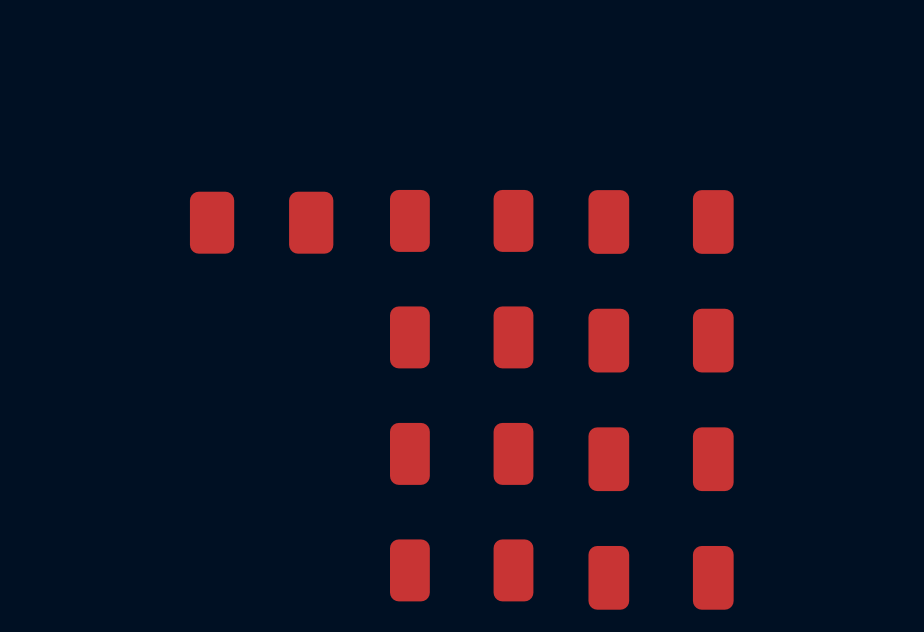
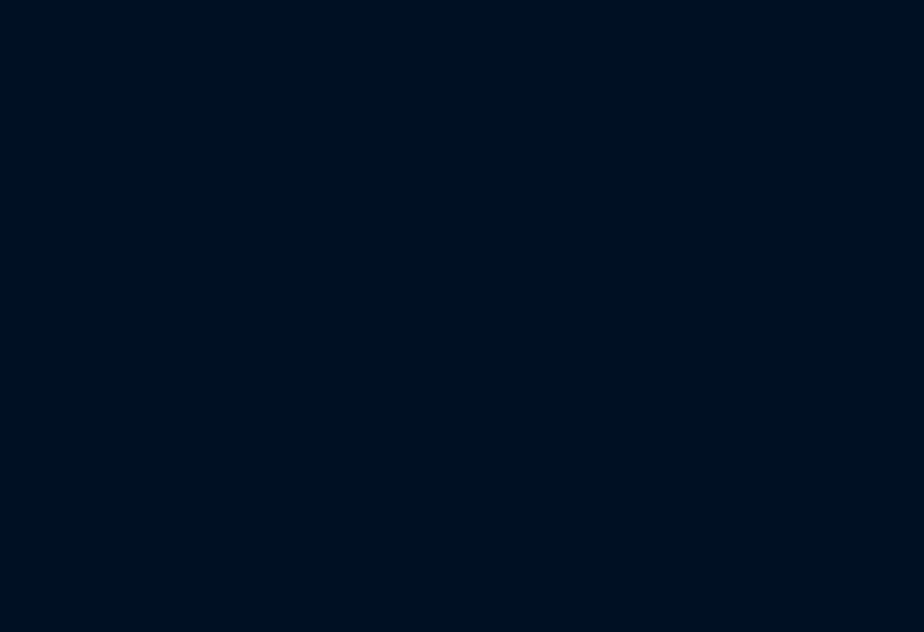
part: (461, 220) -> none
part: (661, 221) -> none
part: (261, 222) -> none
part: (461, 337) -> none
part: (661, 340) -> none
part: (461, 453) -> none
part: (661, 459) -> none
part: (461, 570) -> none
part: (661, 577) -> none

